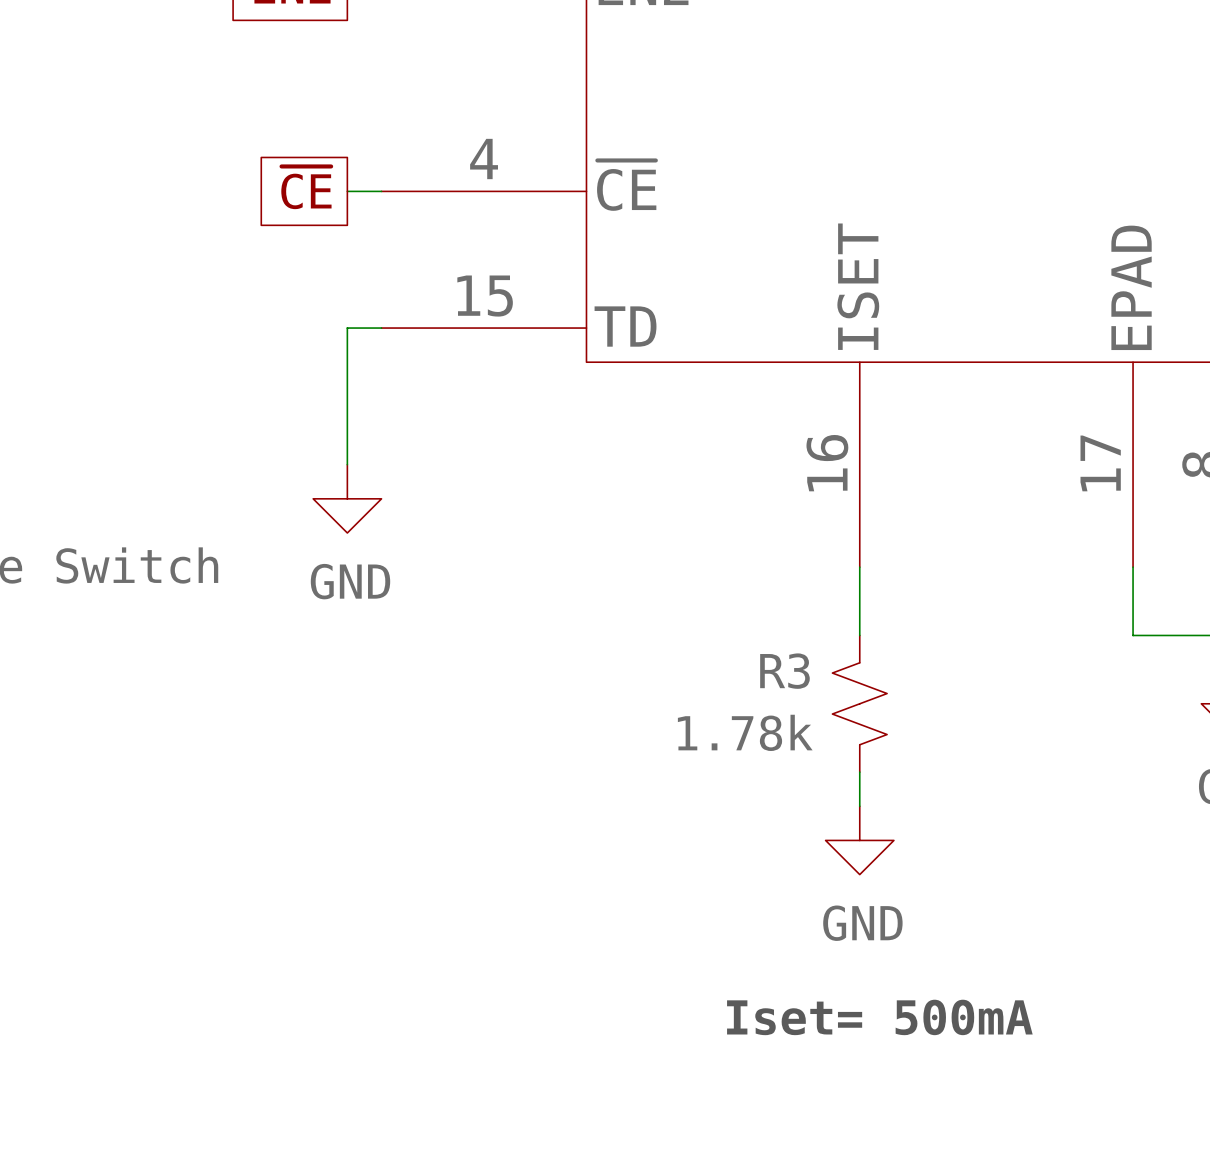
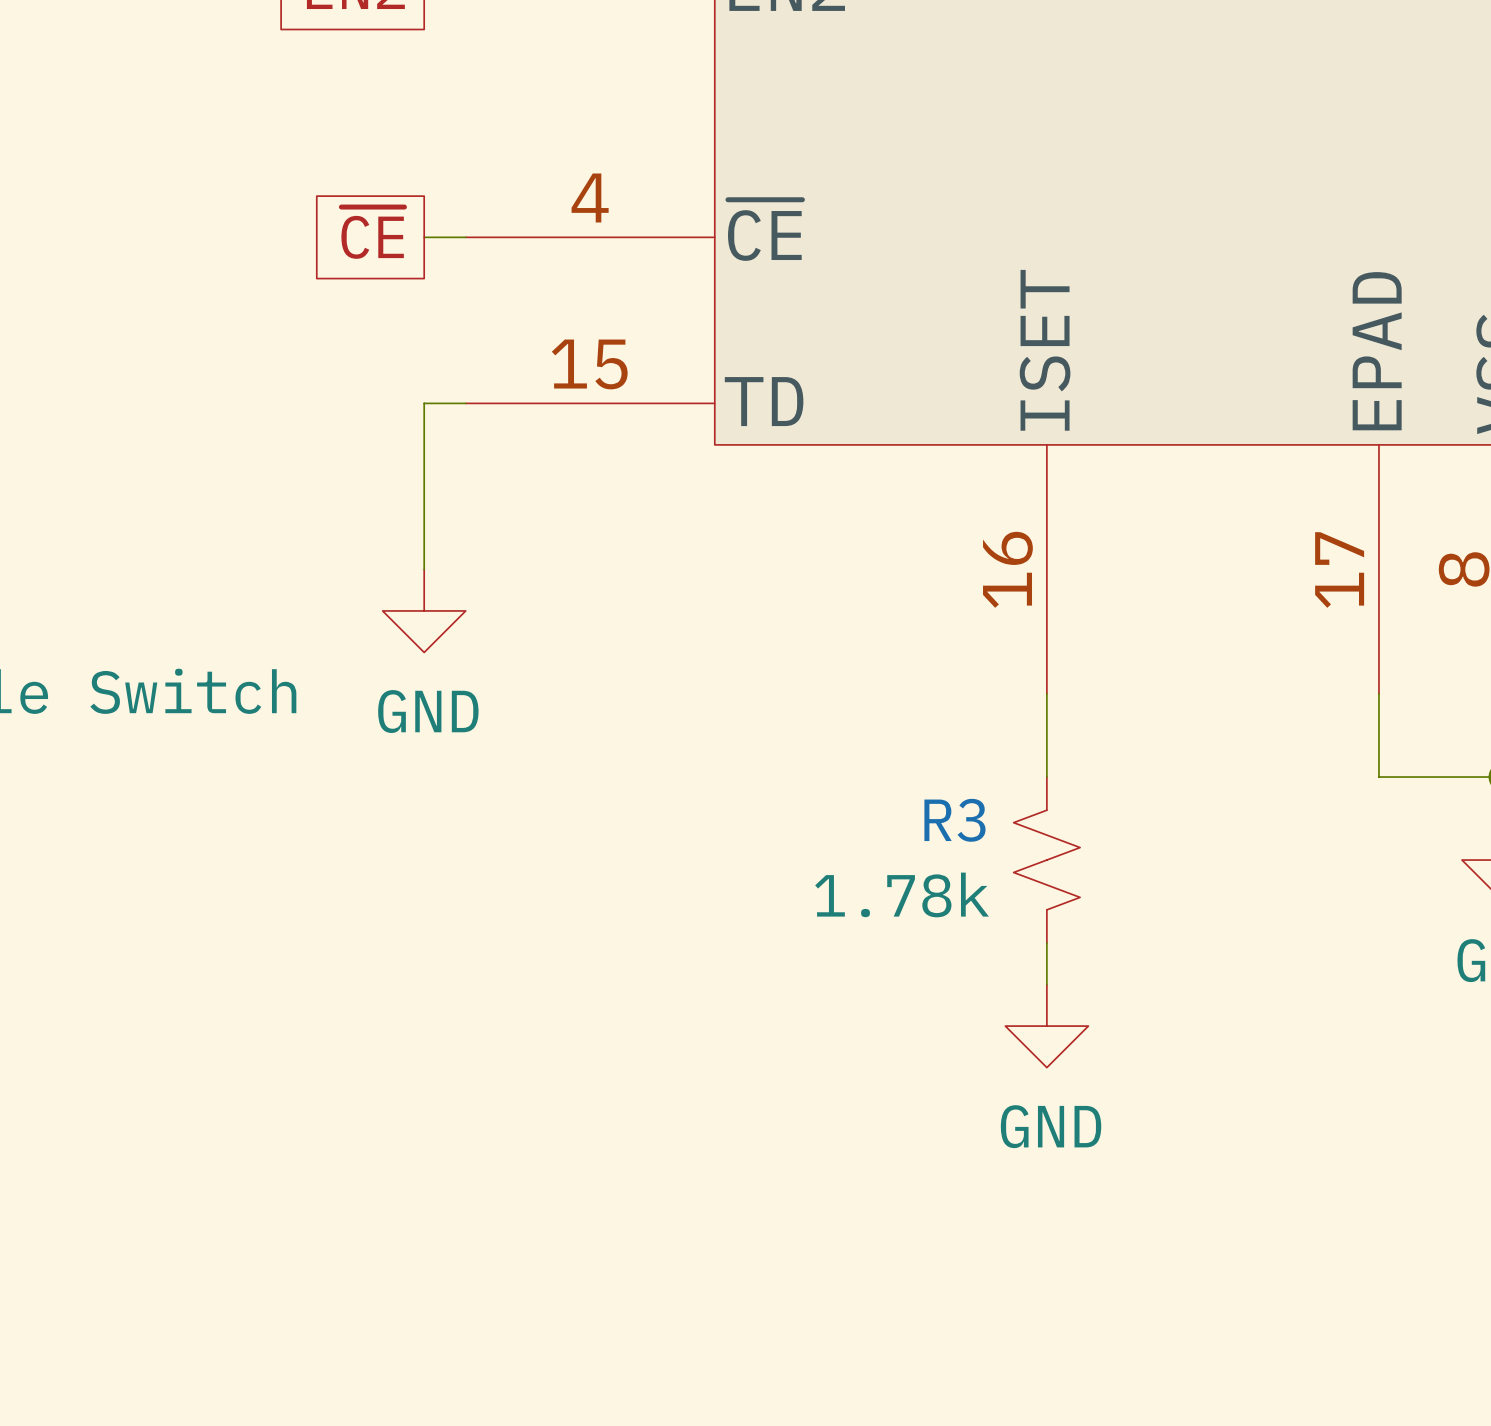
text: Iset= 500mA (879, 1017) -> none

